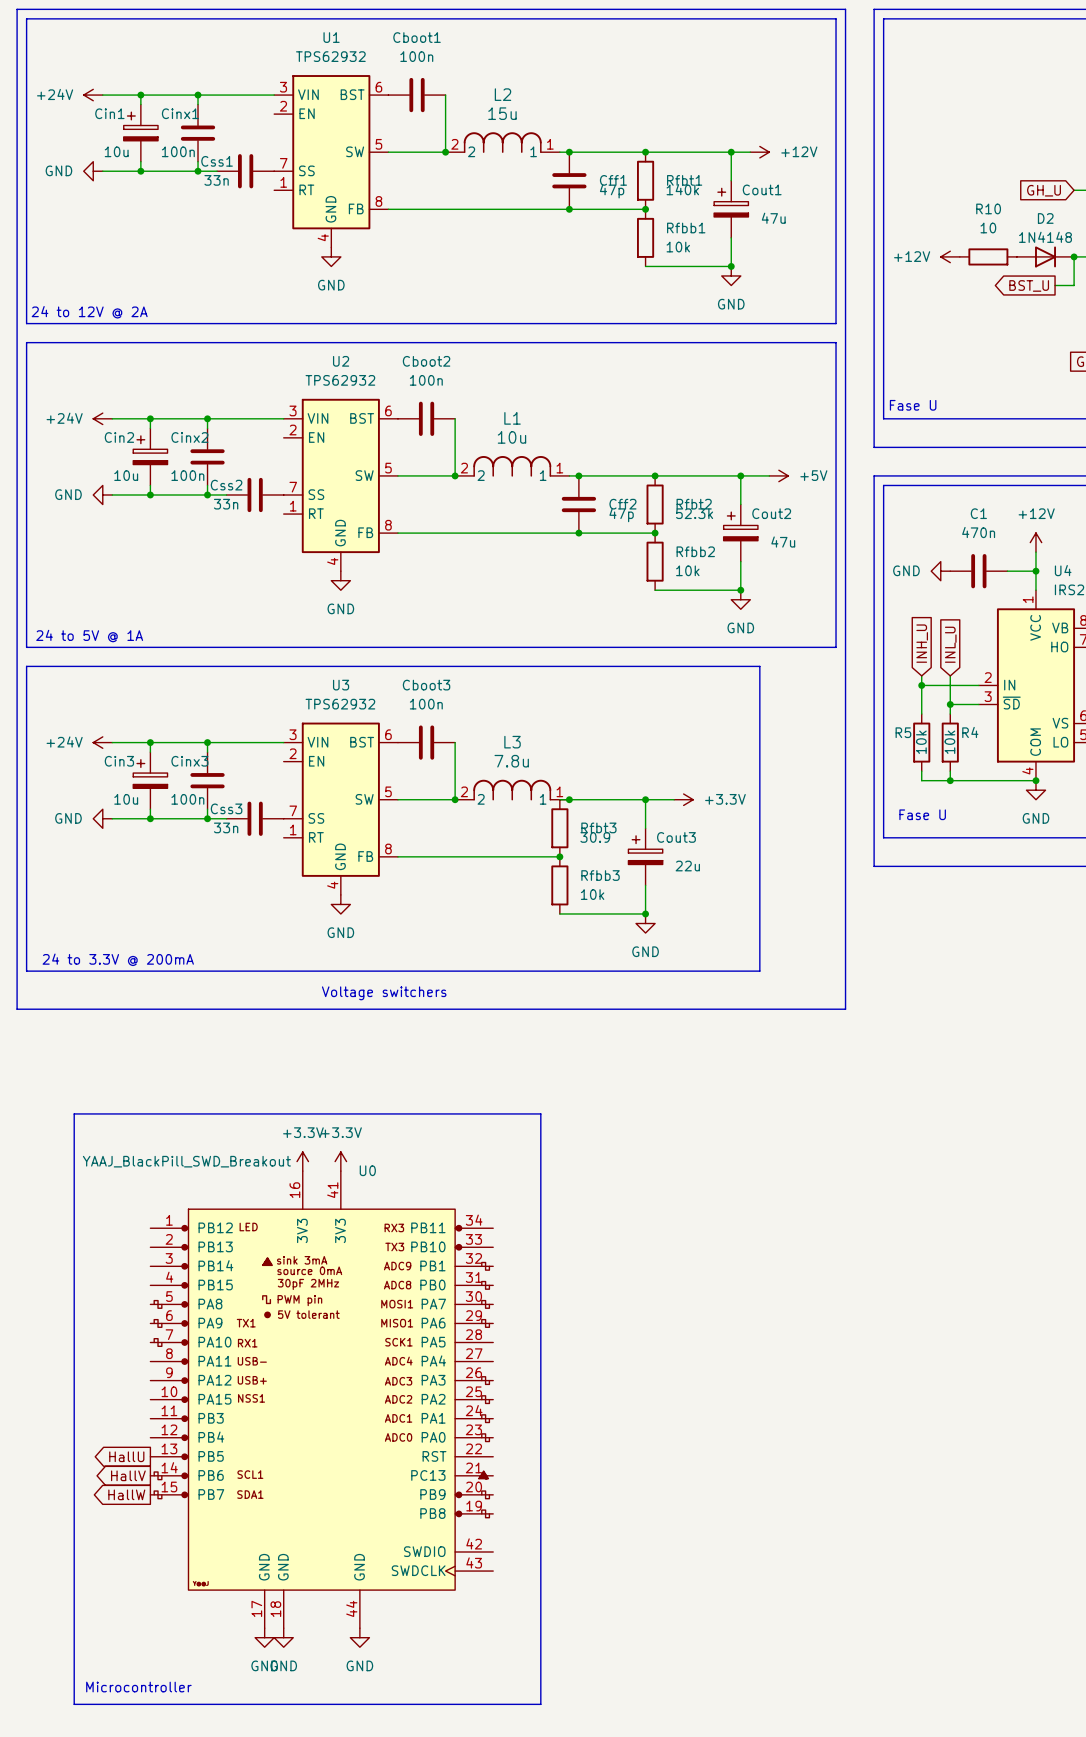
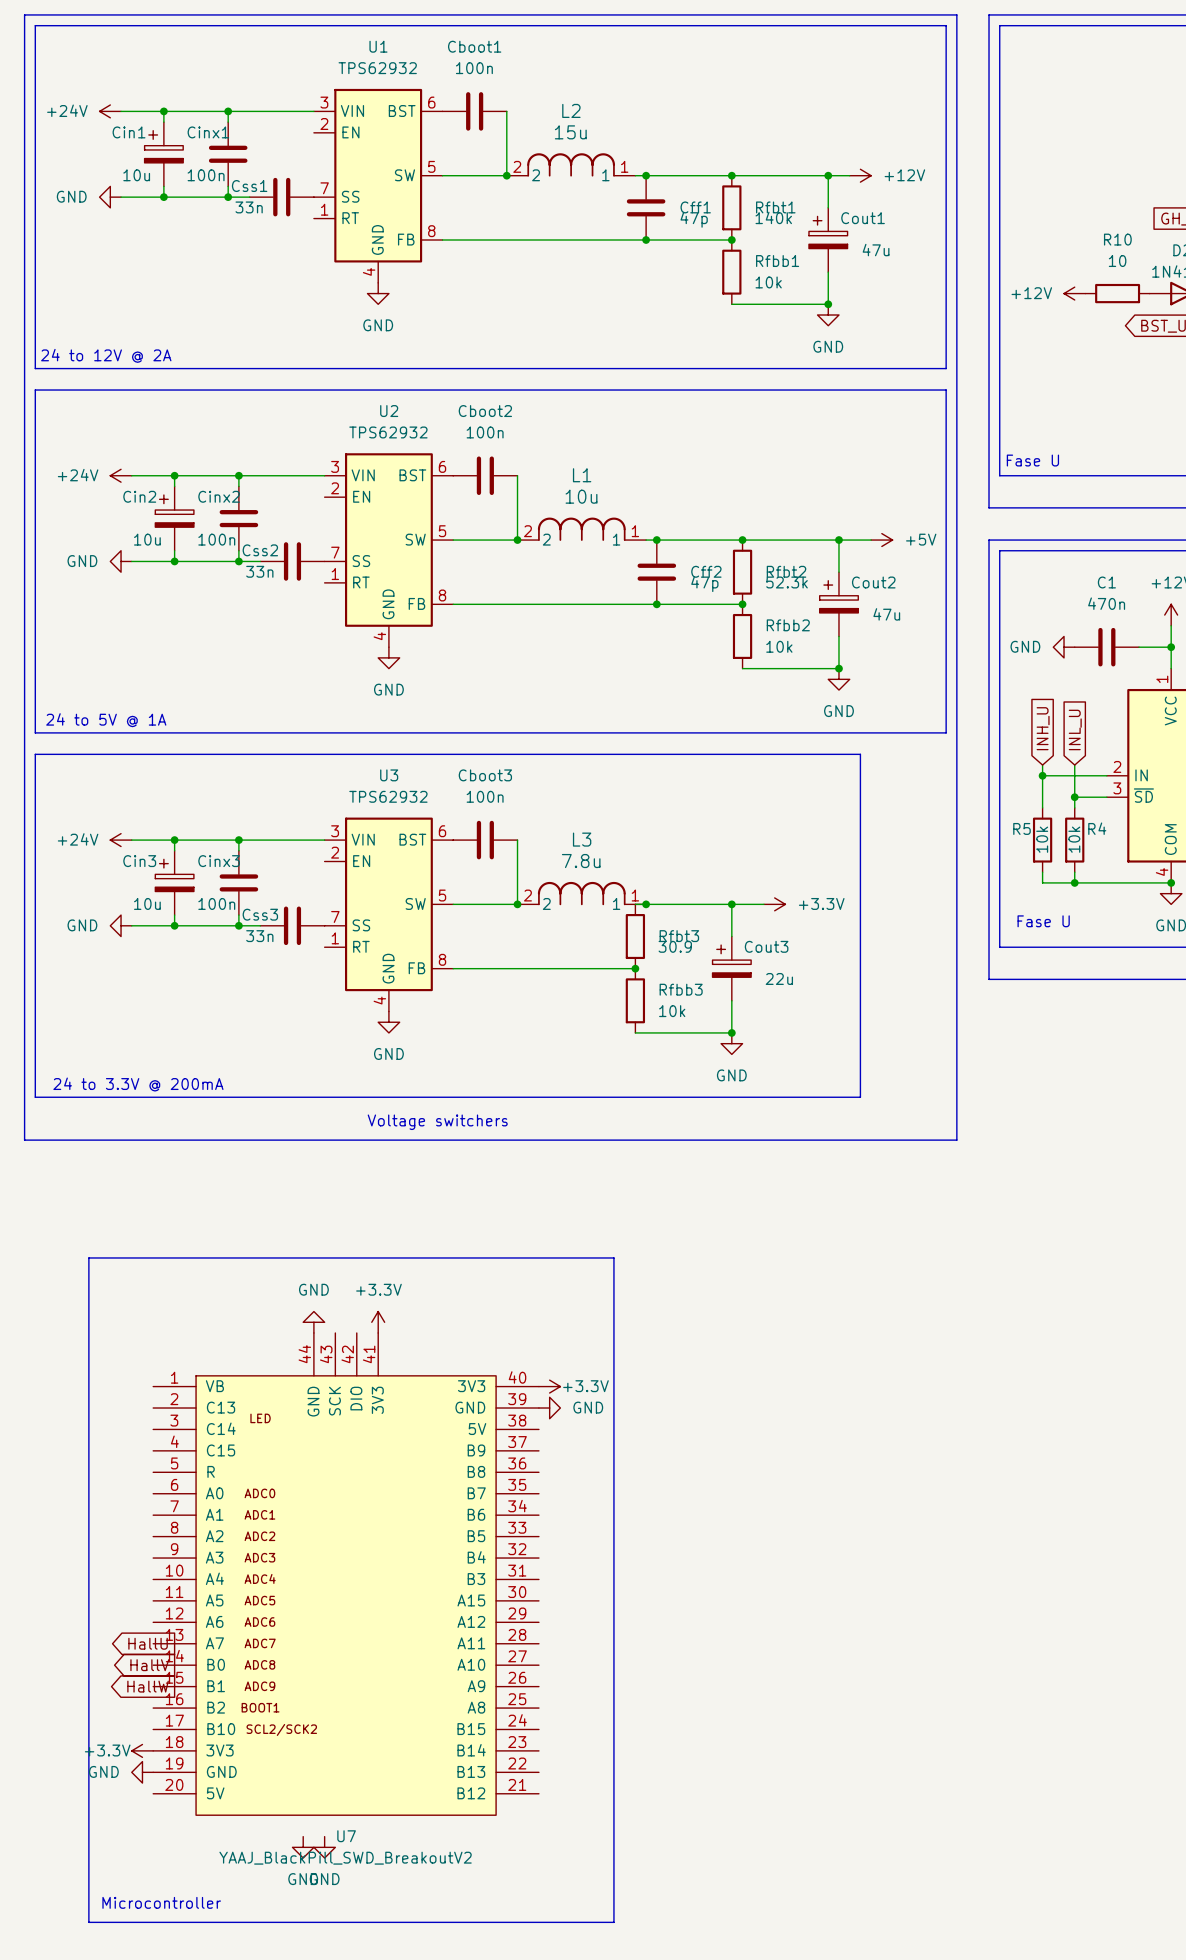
power symbol: +3.3V (302, 1161) -> none
power symbol position: +3.3V (340, 1161) -> +3.3V (378, 1322)
power symbol: none -> GND (313, 1322)
power symbol: none -> +3.3V (549, 1386)
power symbol: none -> GND (549, 1408)
U7: none -> YAAJ_BlackPill_SWD_BreakoutV2 (346, 1574)
U0: YAAJ_BlackPill_SWD_Breakout (321, 1399) -> none
power symbol: none -> +3.3V (142, 1750)
power symbol: none -> GND (142, 1772)
power symbol: GND (359, 1637) -> none

